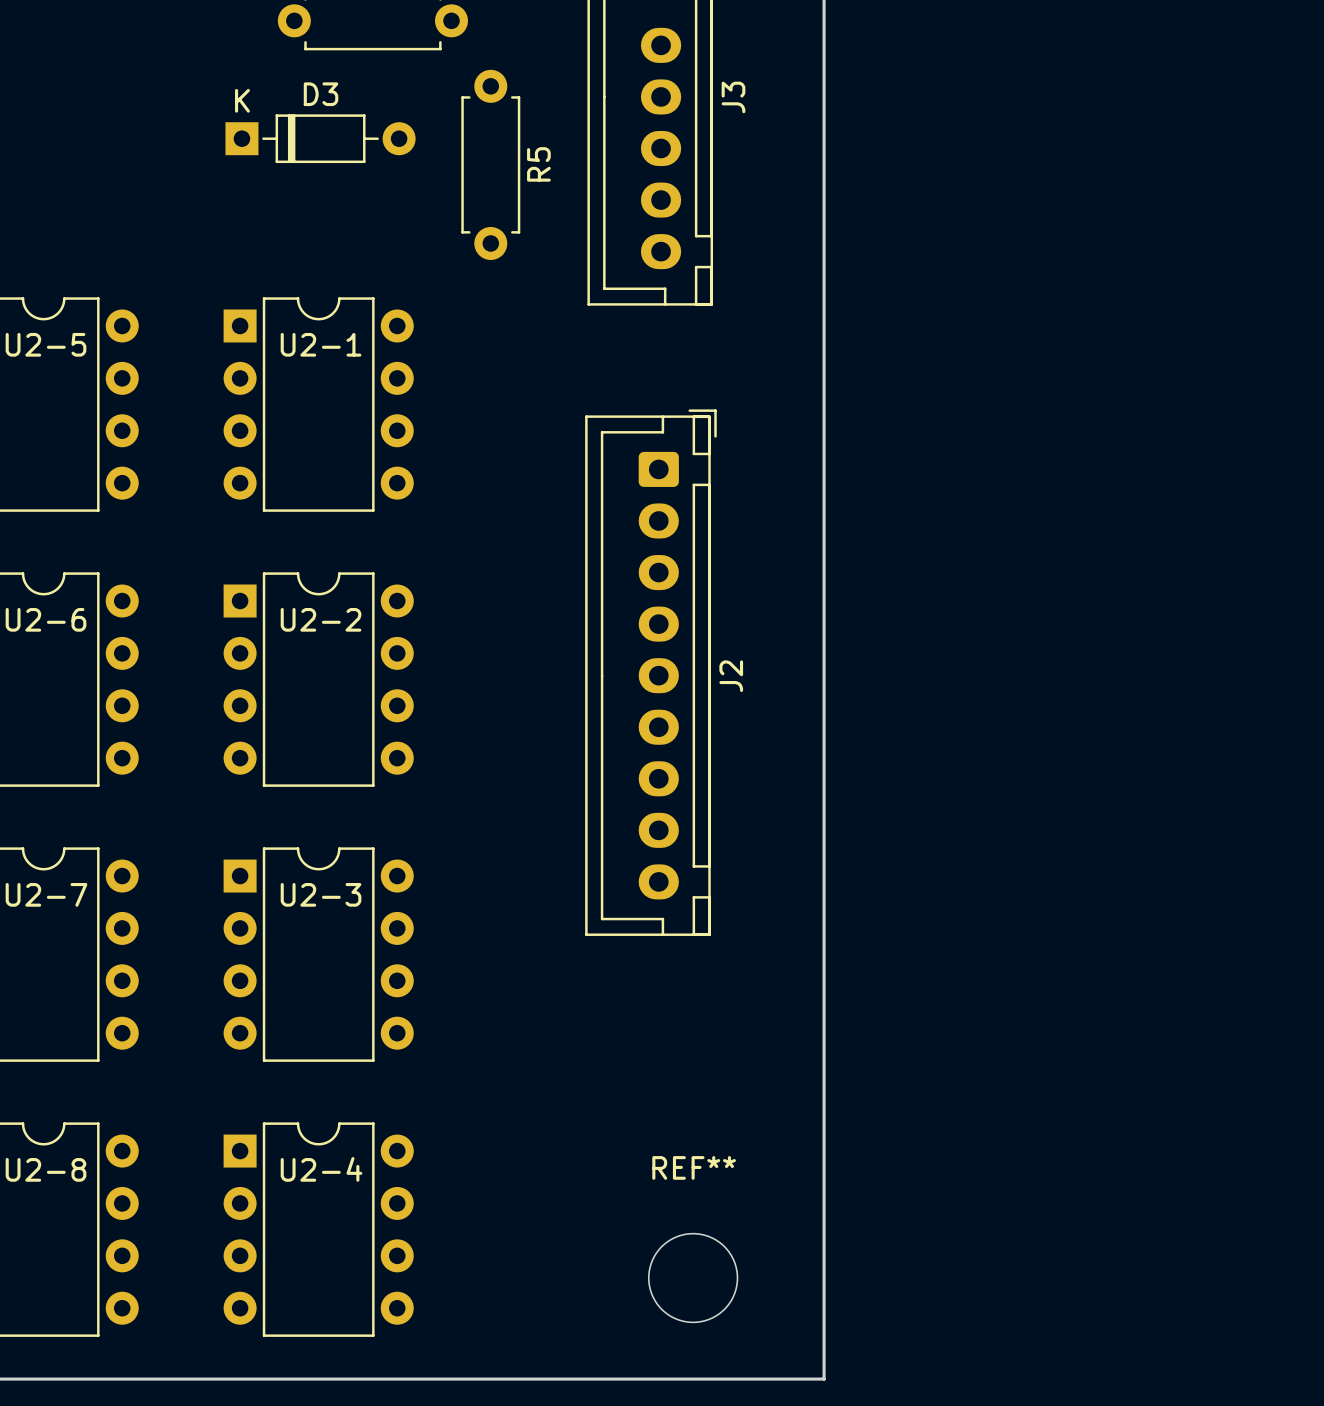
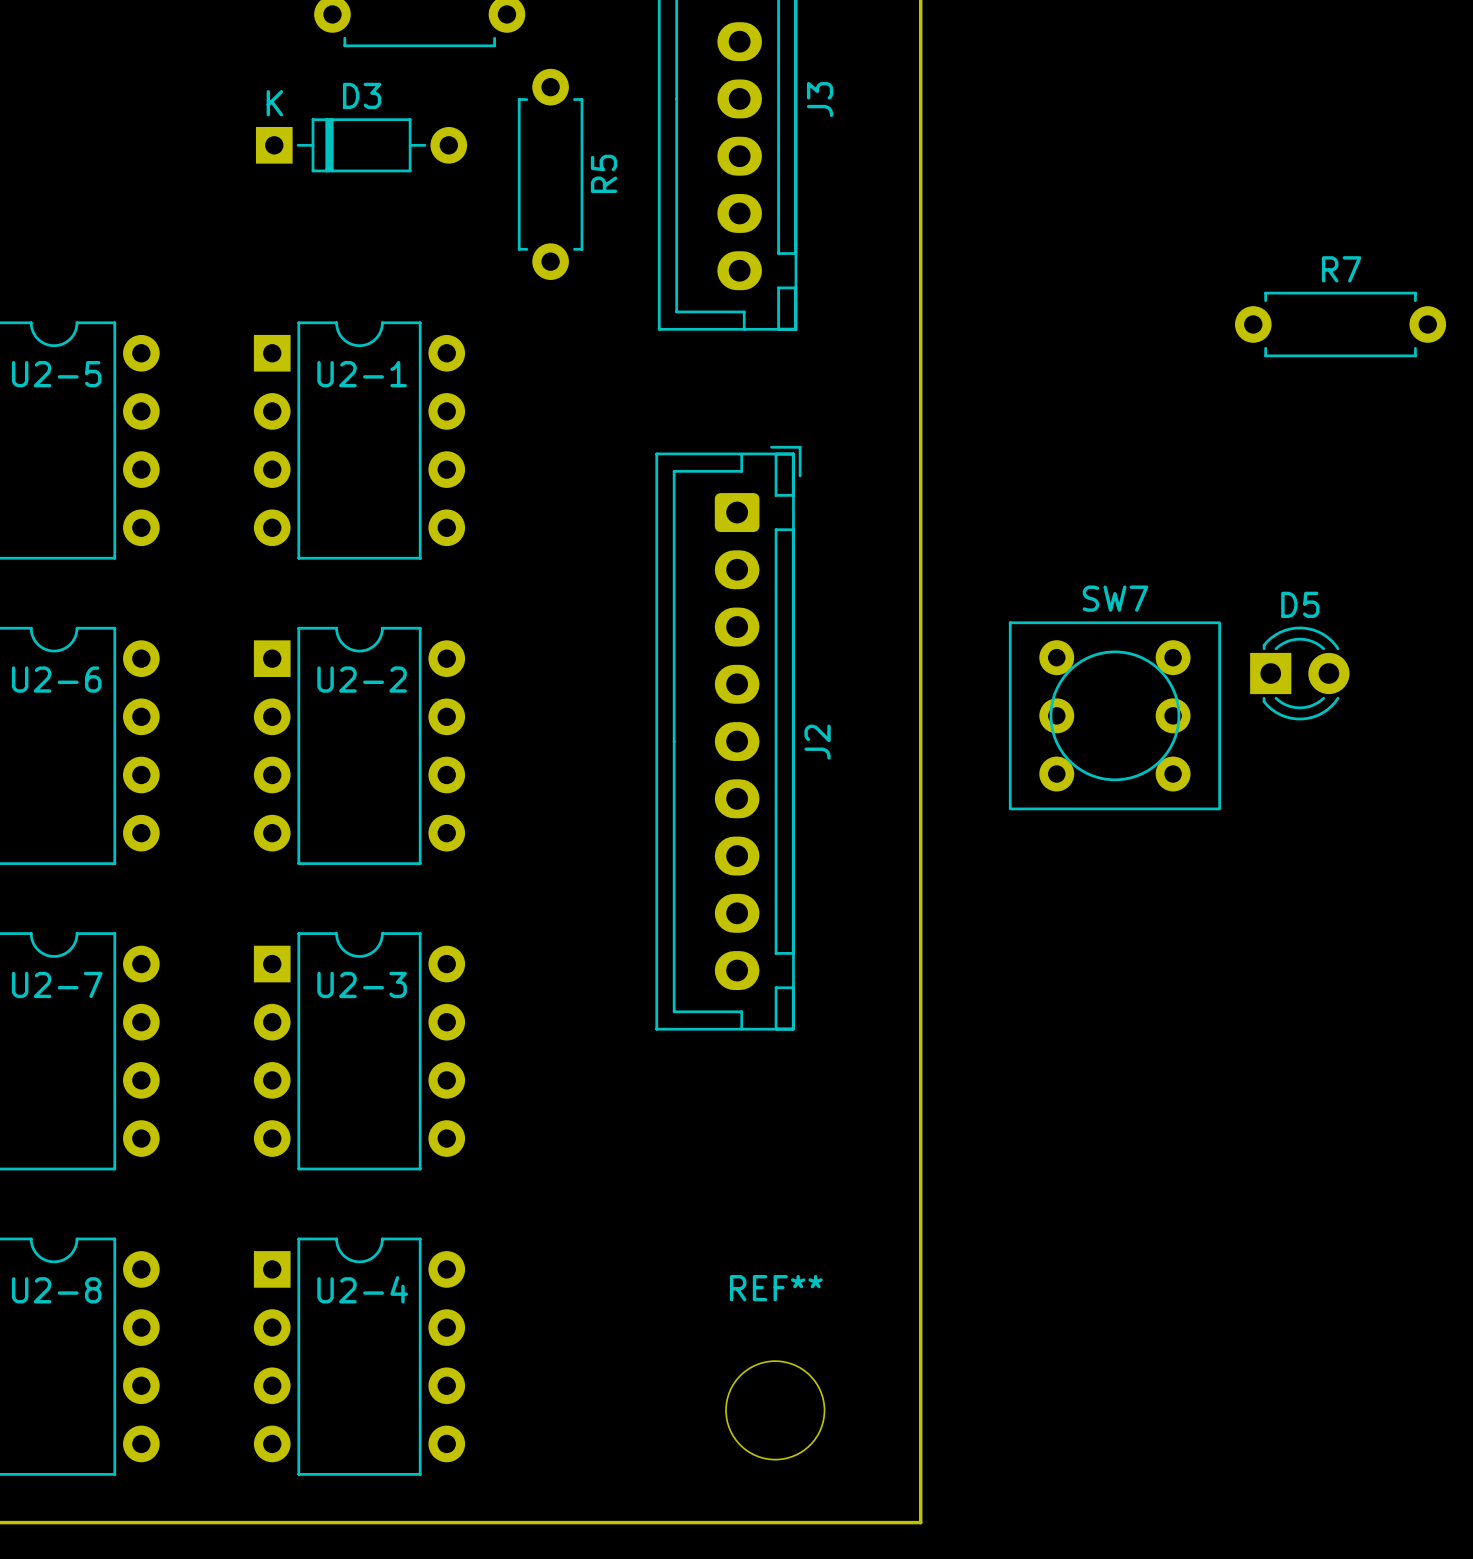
R7: none -> (1340, 324)
D5: none -> (1299, 673)
SW7: none -> (1114, 715)

